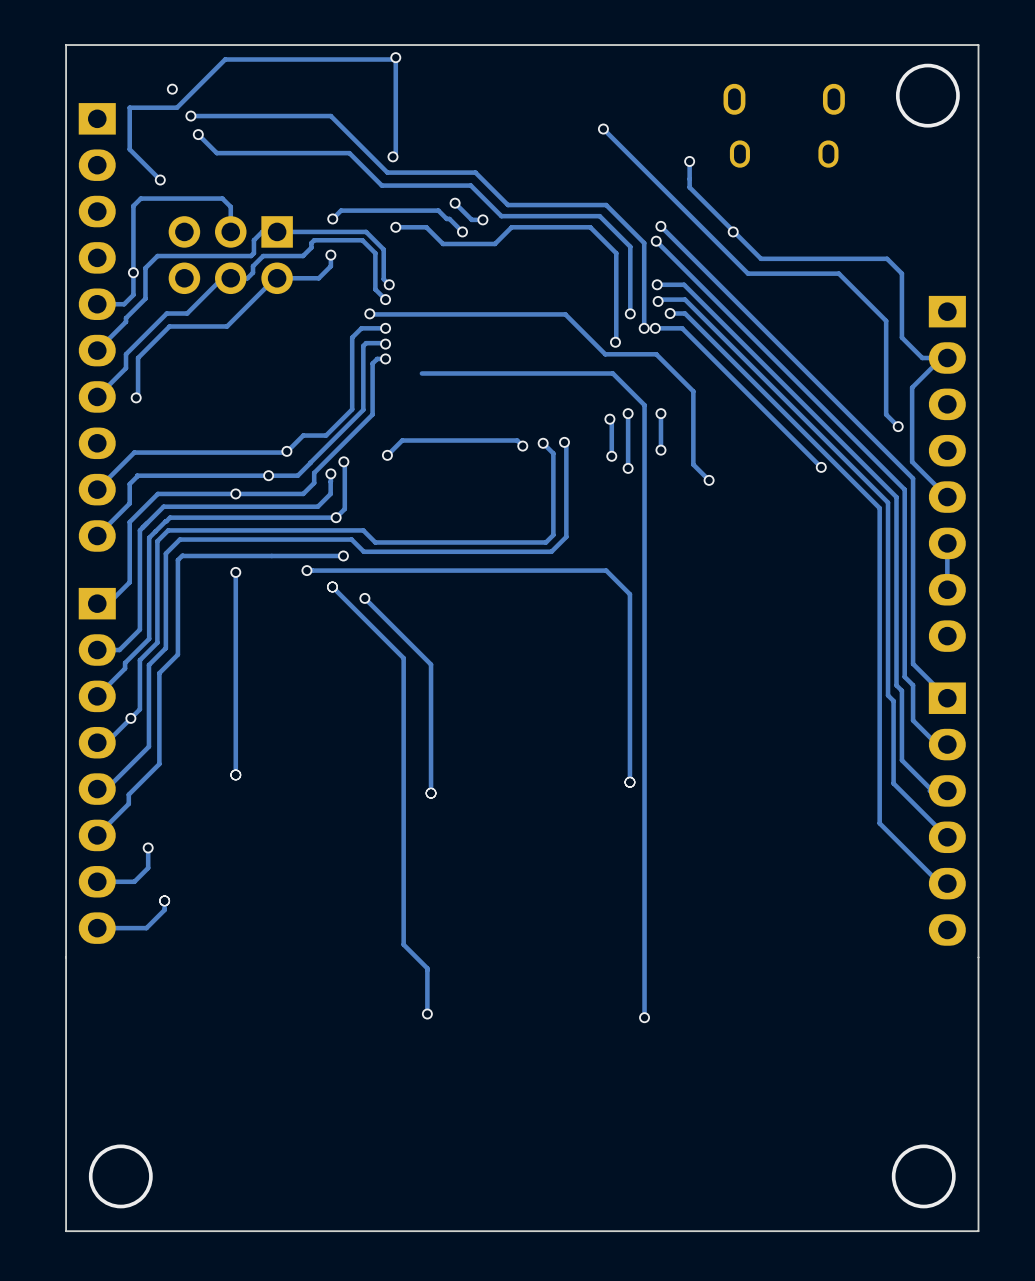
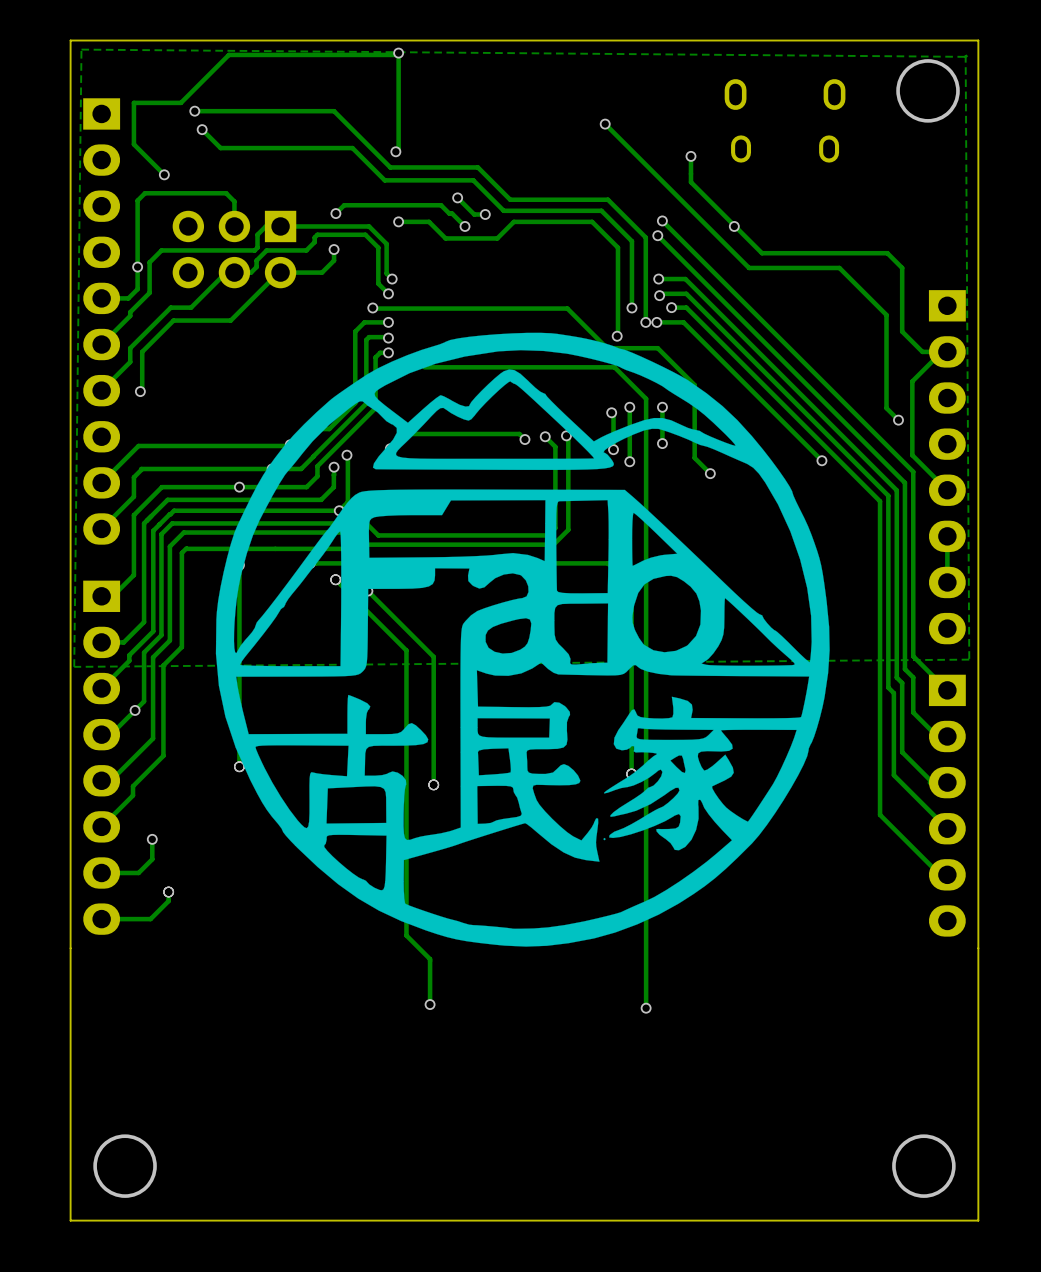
zone outline: none -> (81, 49) (74, 666) (969, 659) (965, 55) (967, 56) (81, 49)
via: (172, 89) -> none
drawing: none -> [215, 332, 830, 947]

